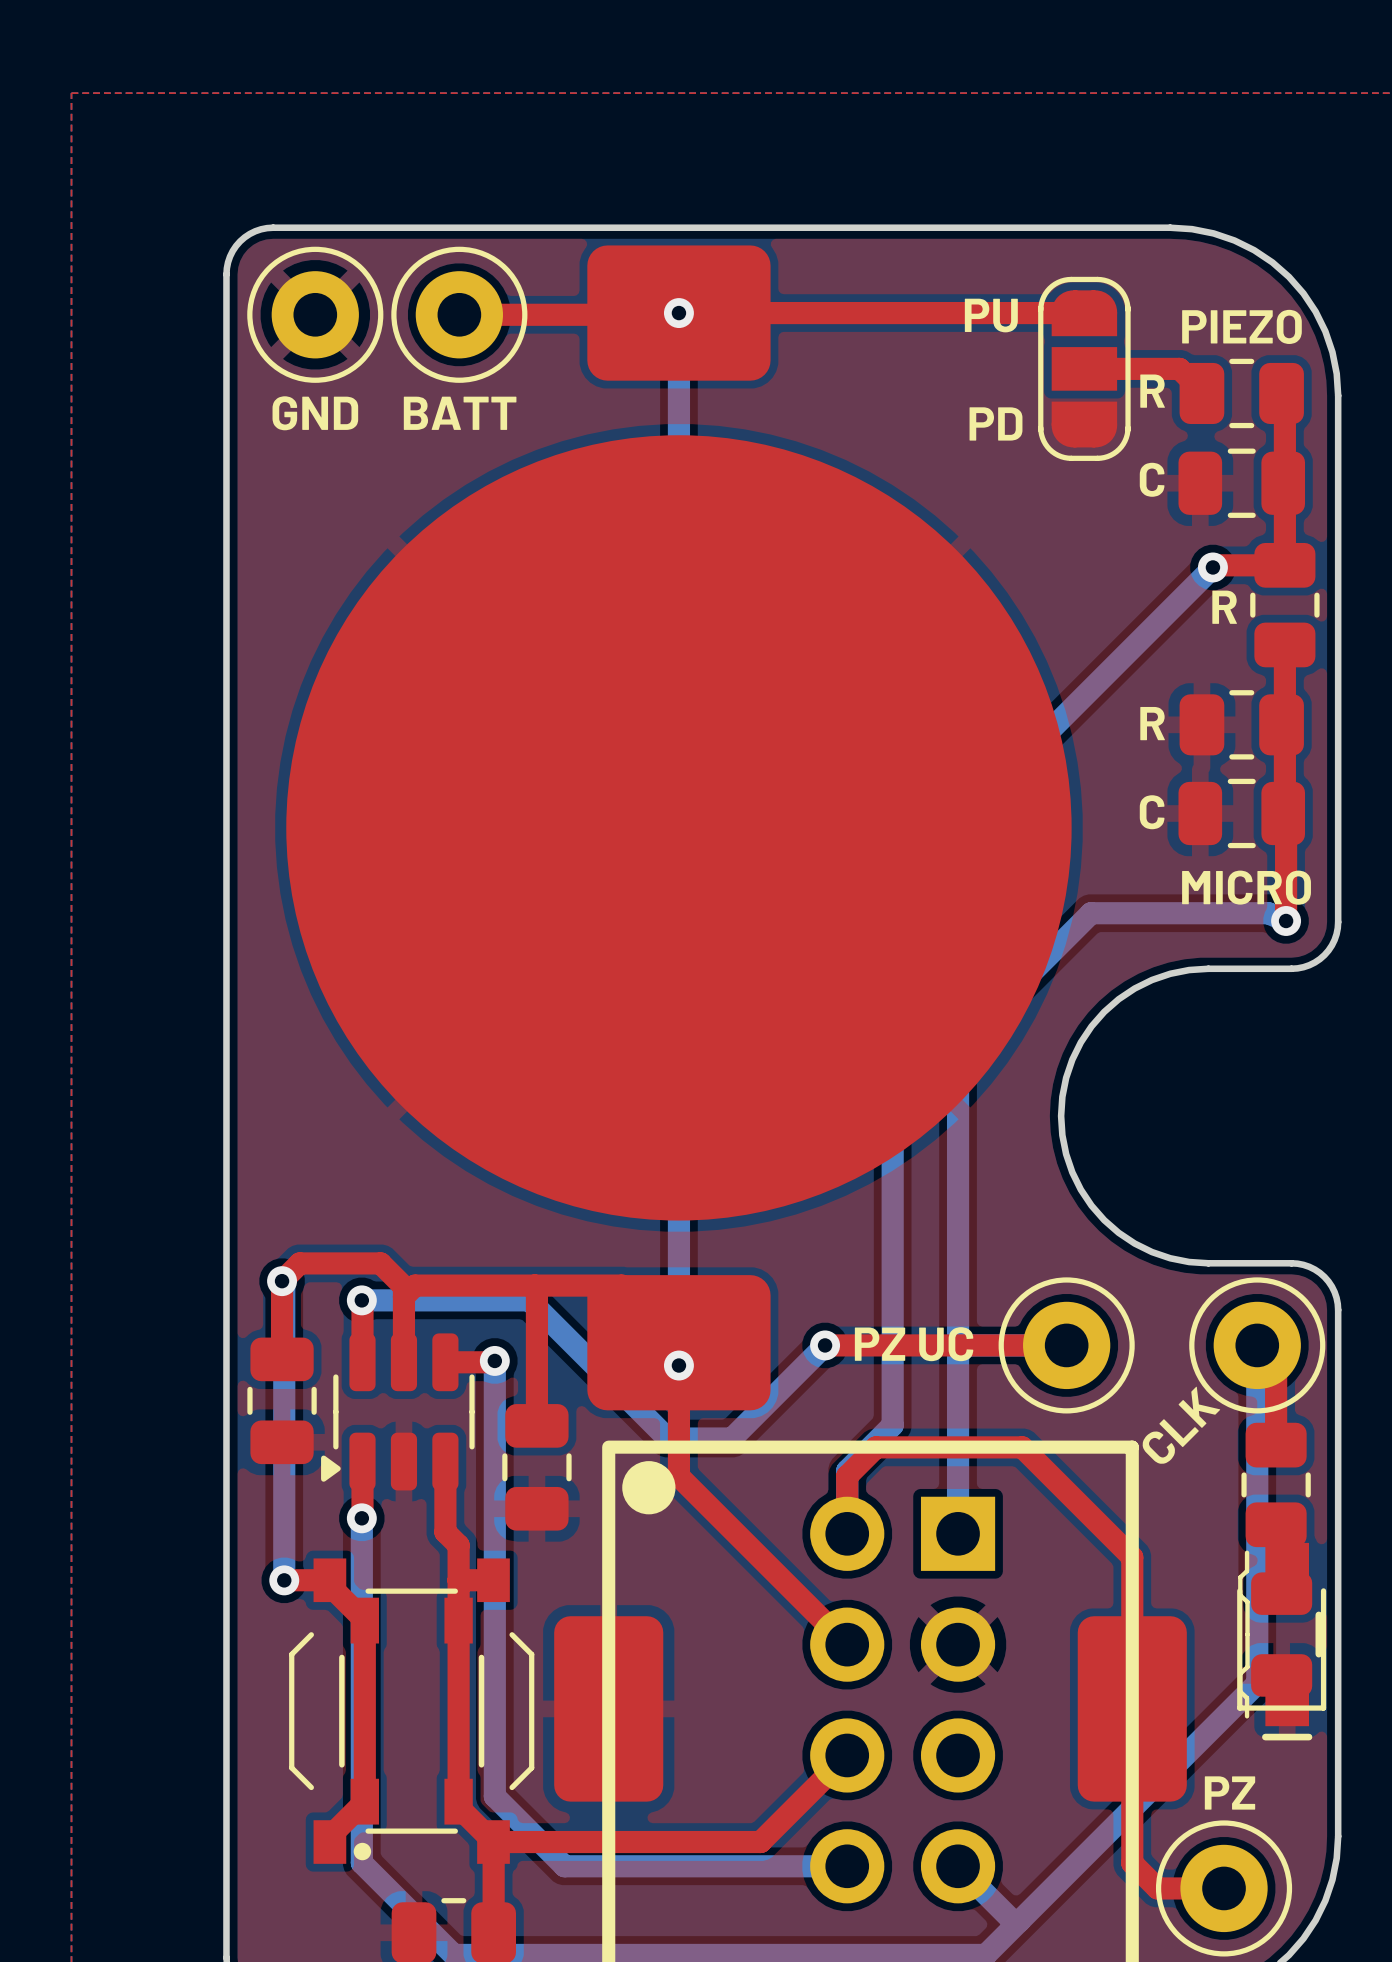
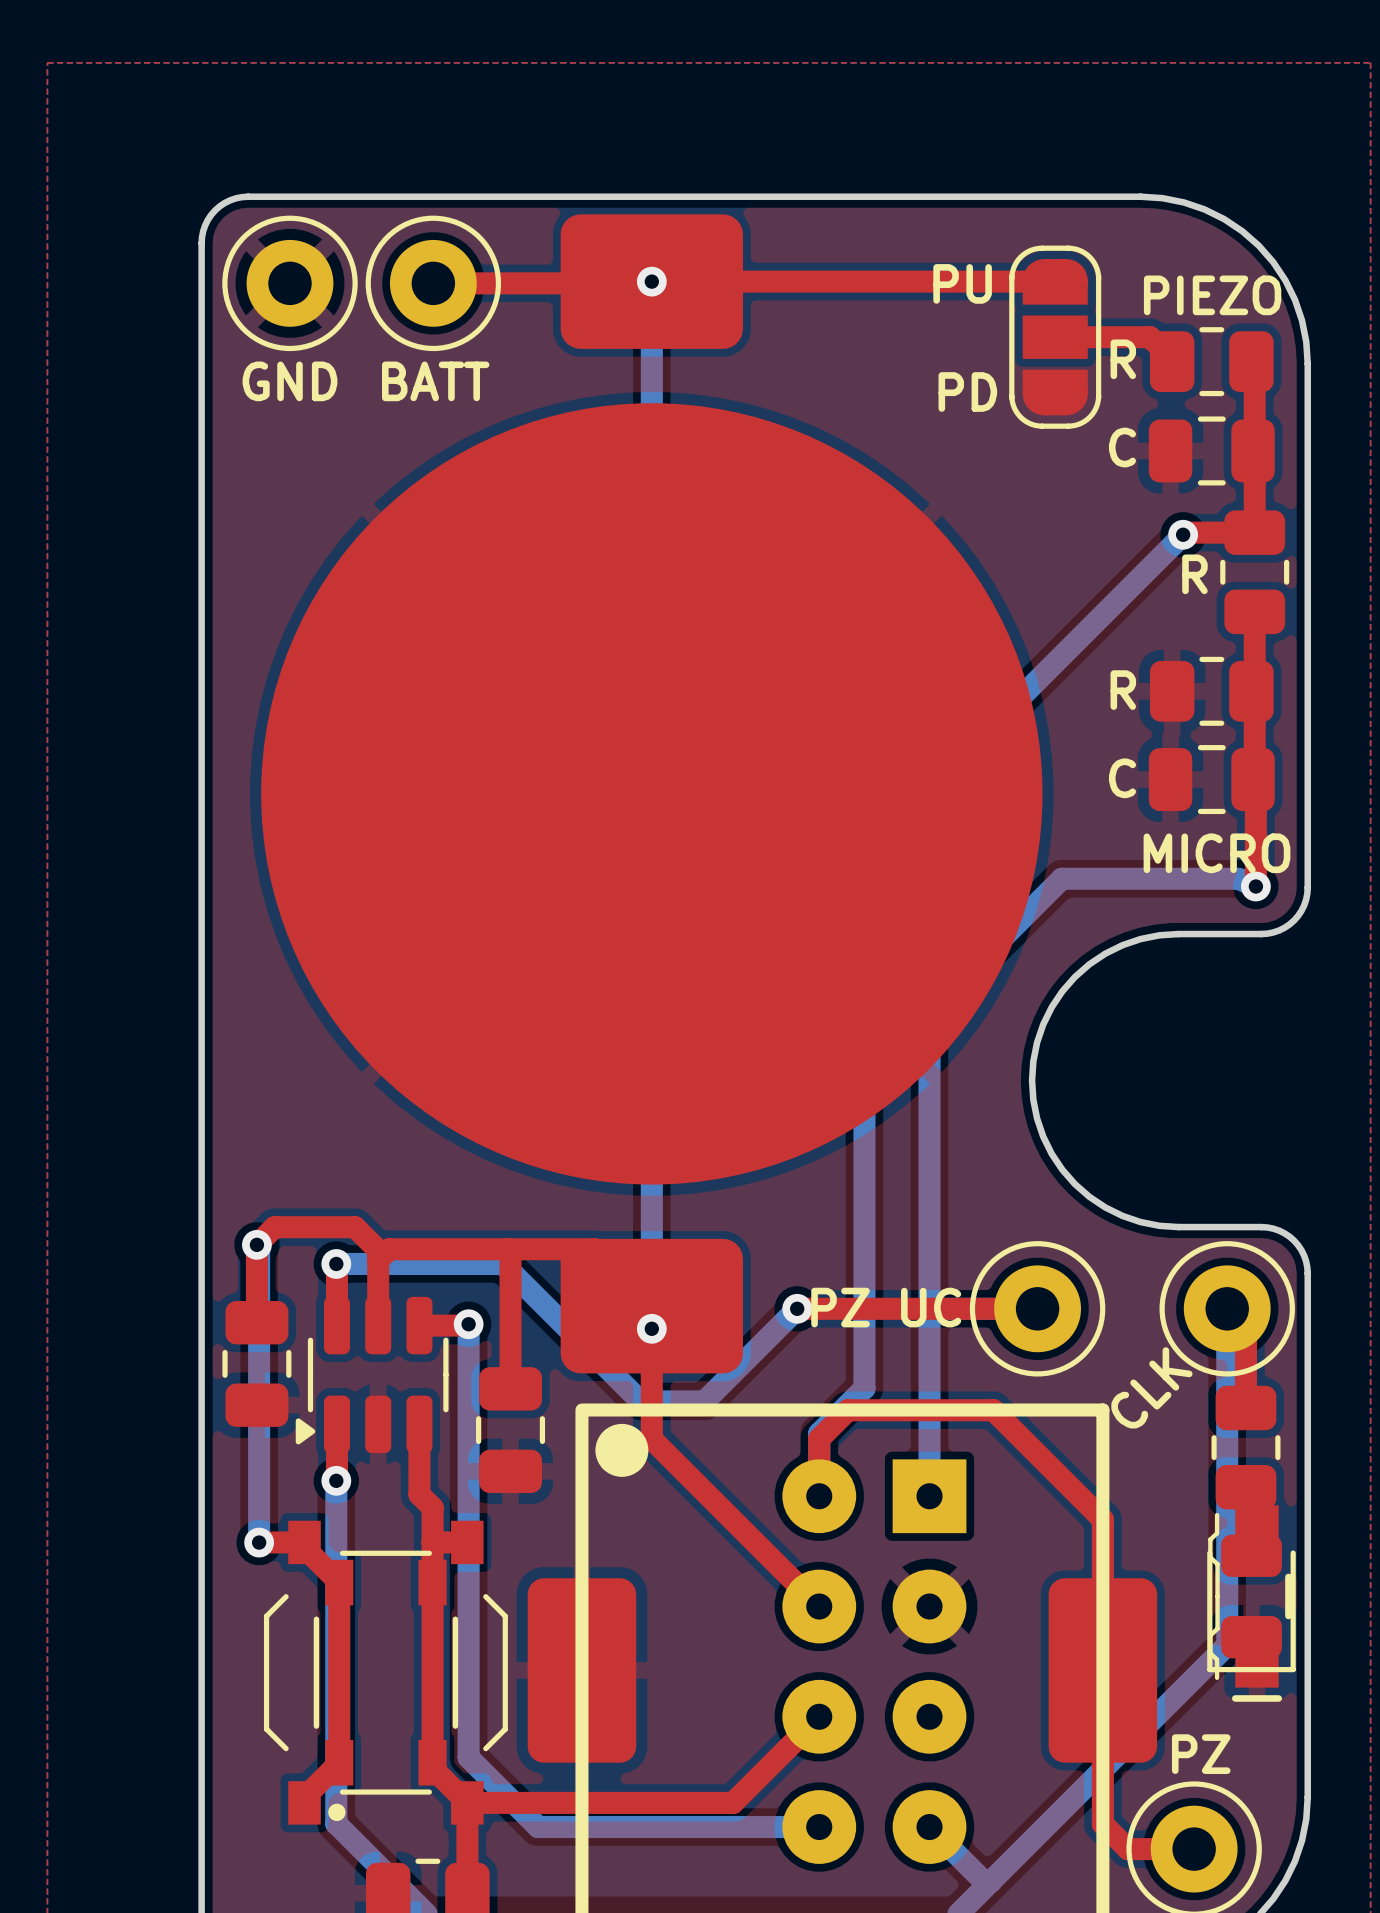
part footprint: [810, 1496, 996, 1904] -> [782, 1459, 967, 1864]

